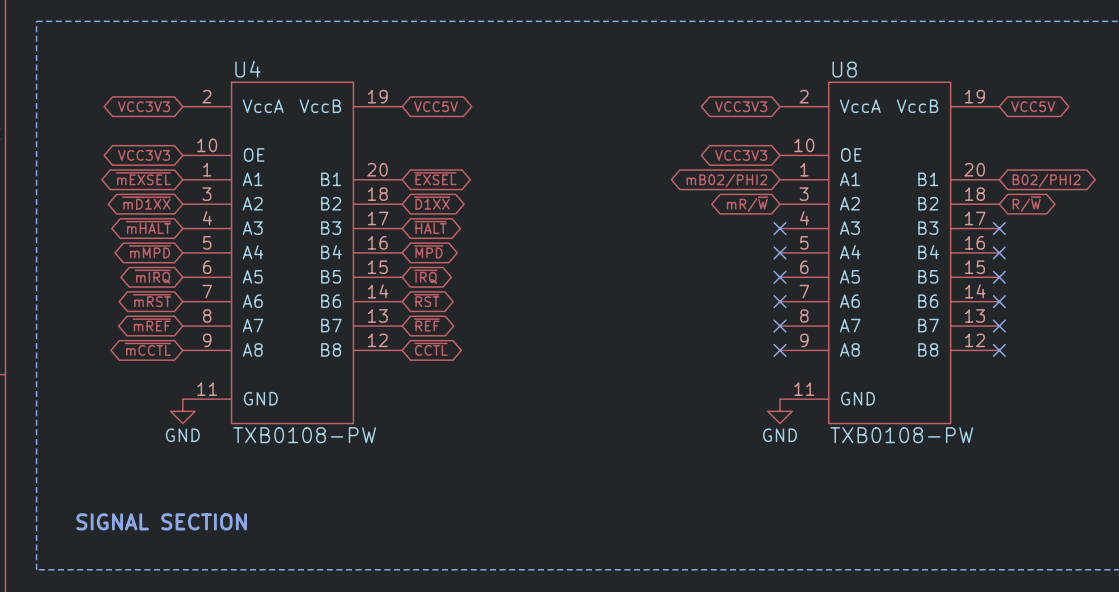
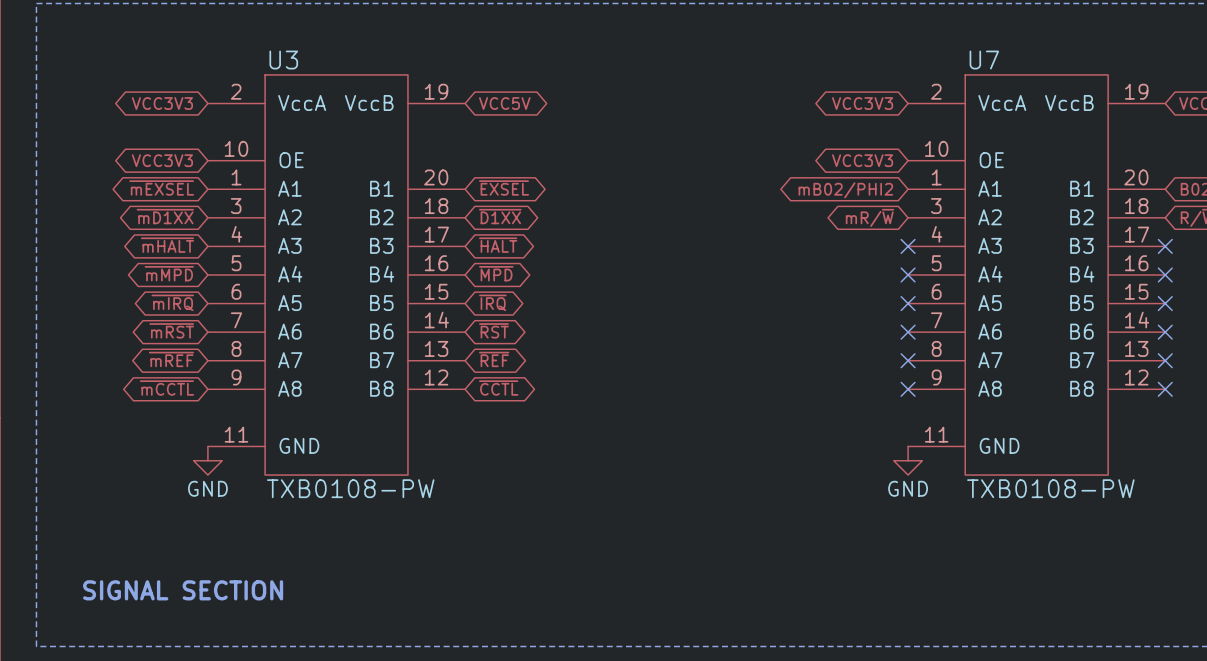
U4 name: U4 (247, 69) -> U3 (283, 60)
U8 name: U8 (844, 69) -> U7 (984, 60)

